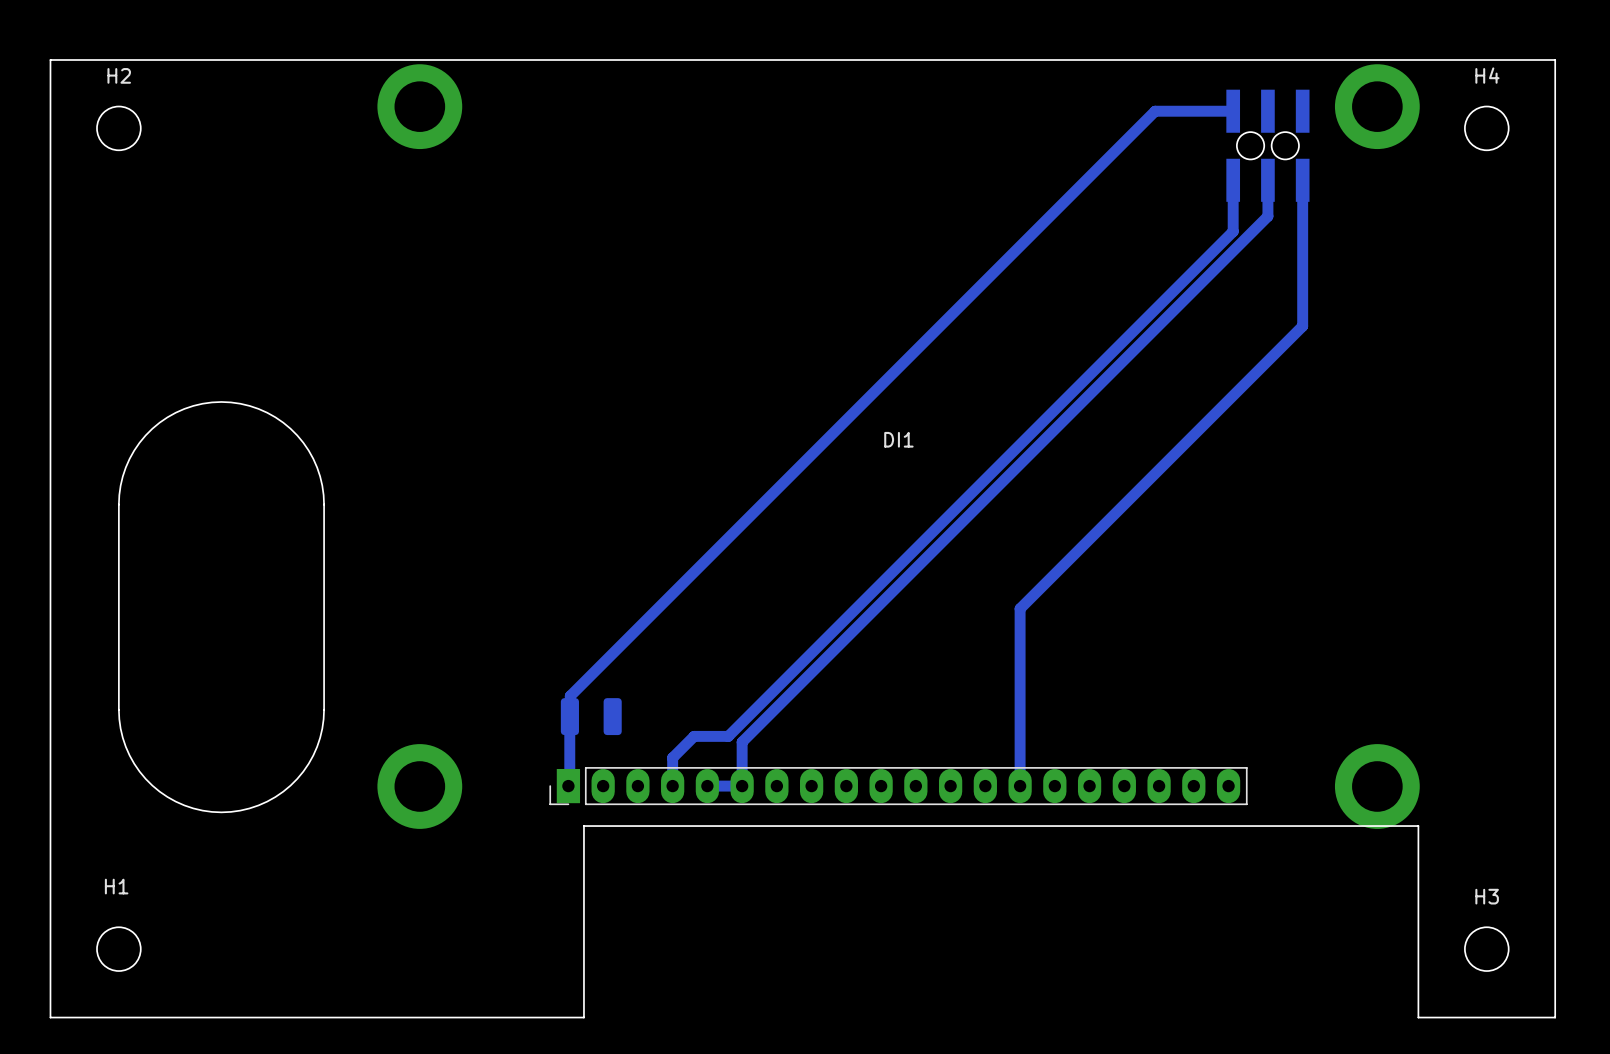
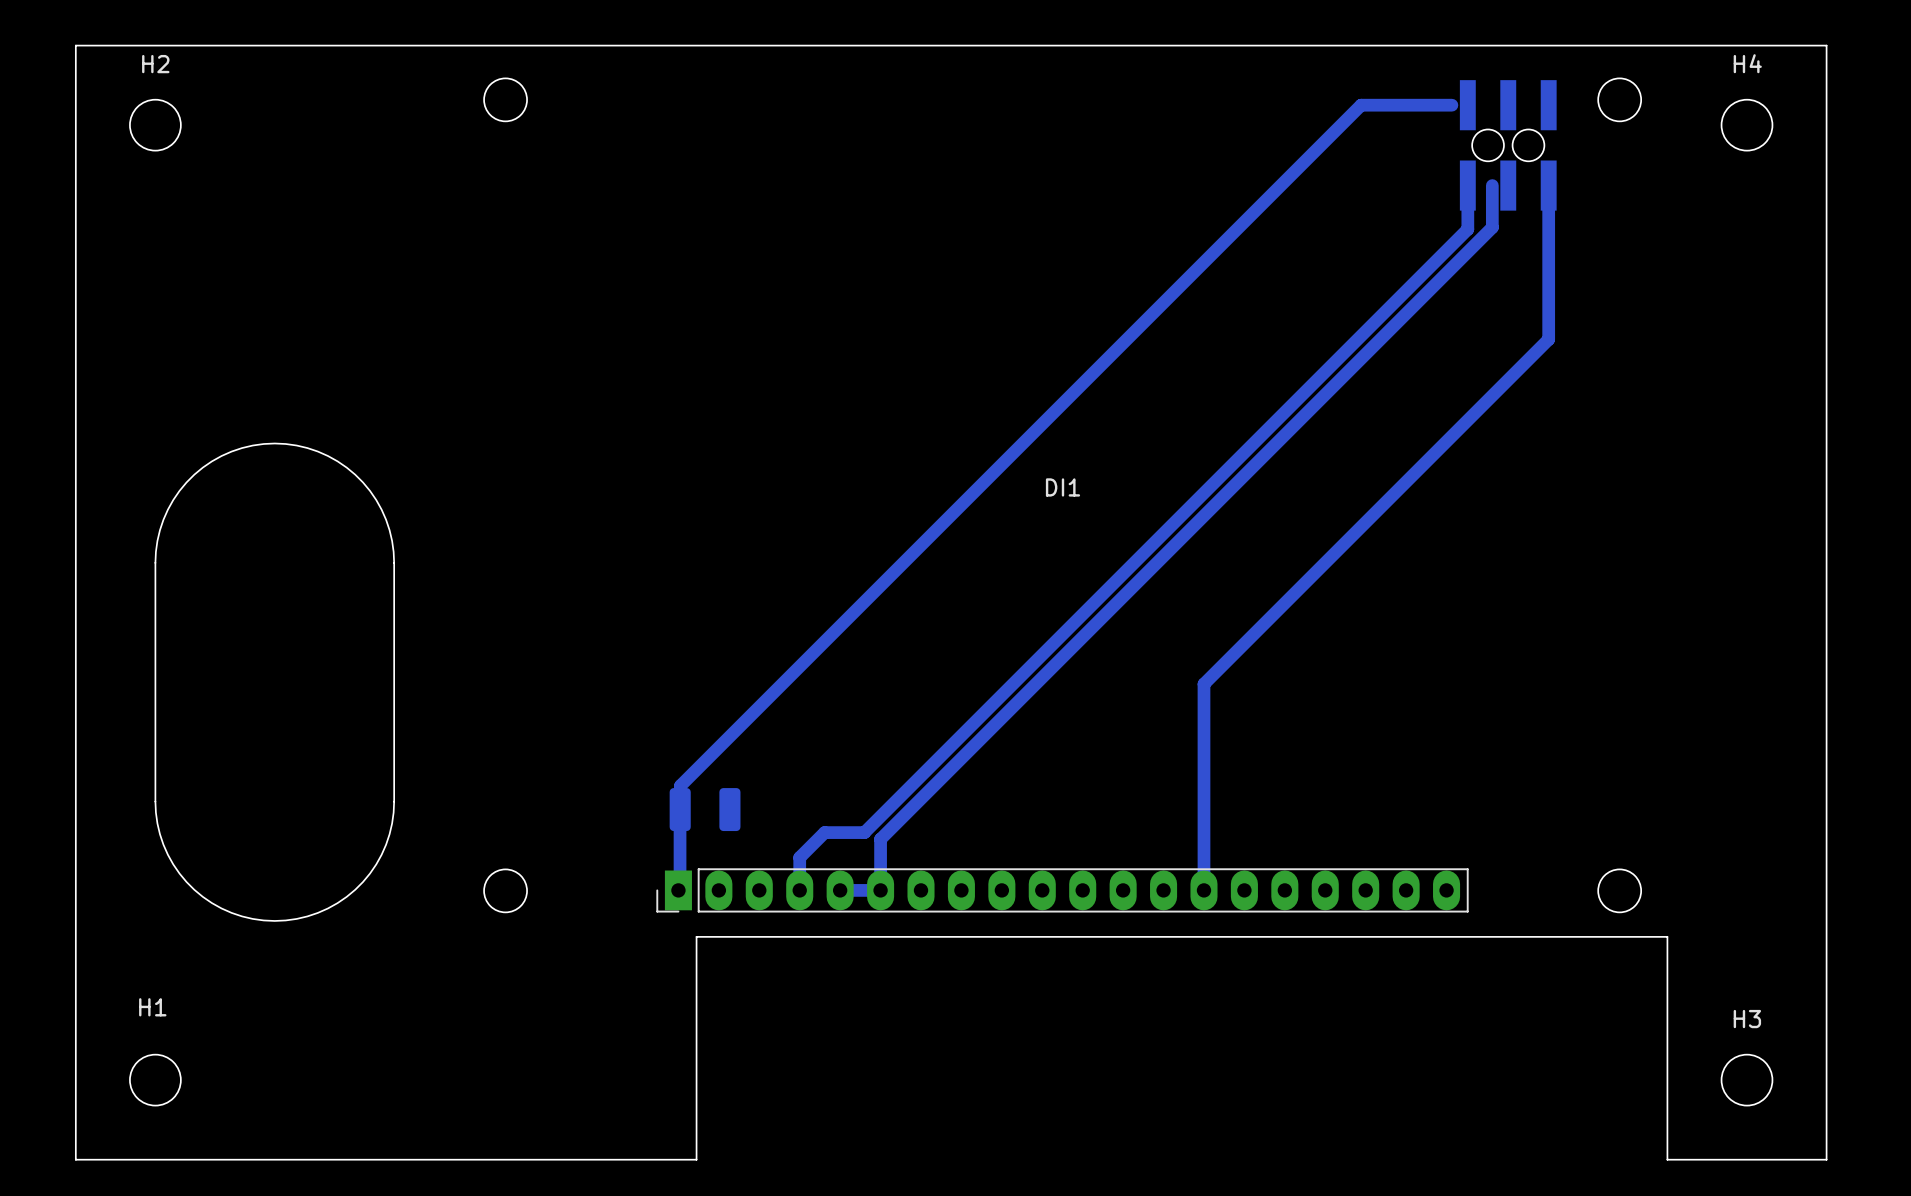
DI1 footprint: [377, 64, 1420, 829] -> [484, 78, 1642, 913]
part position: (1267, 145) -> (1508, 145)
bottom track: (1233, 180) (1233, 231) -> (1467, 185) (1467, 229) (1451, 245)
bottom track: (1302, 180) (1302, 326) -> (1548, 185) (1548, 339) (1532, 355)

